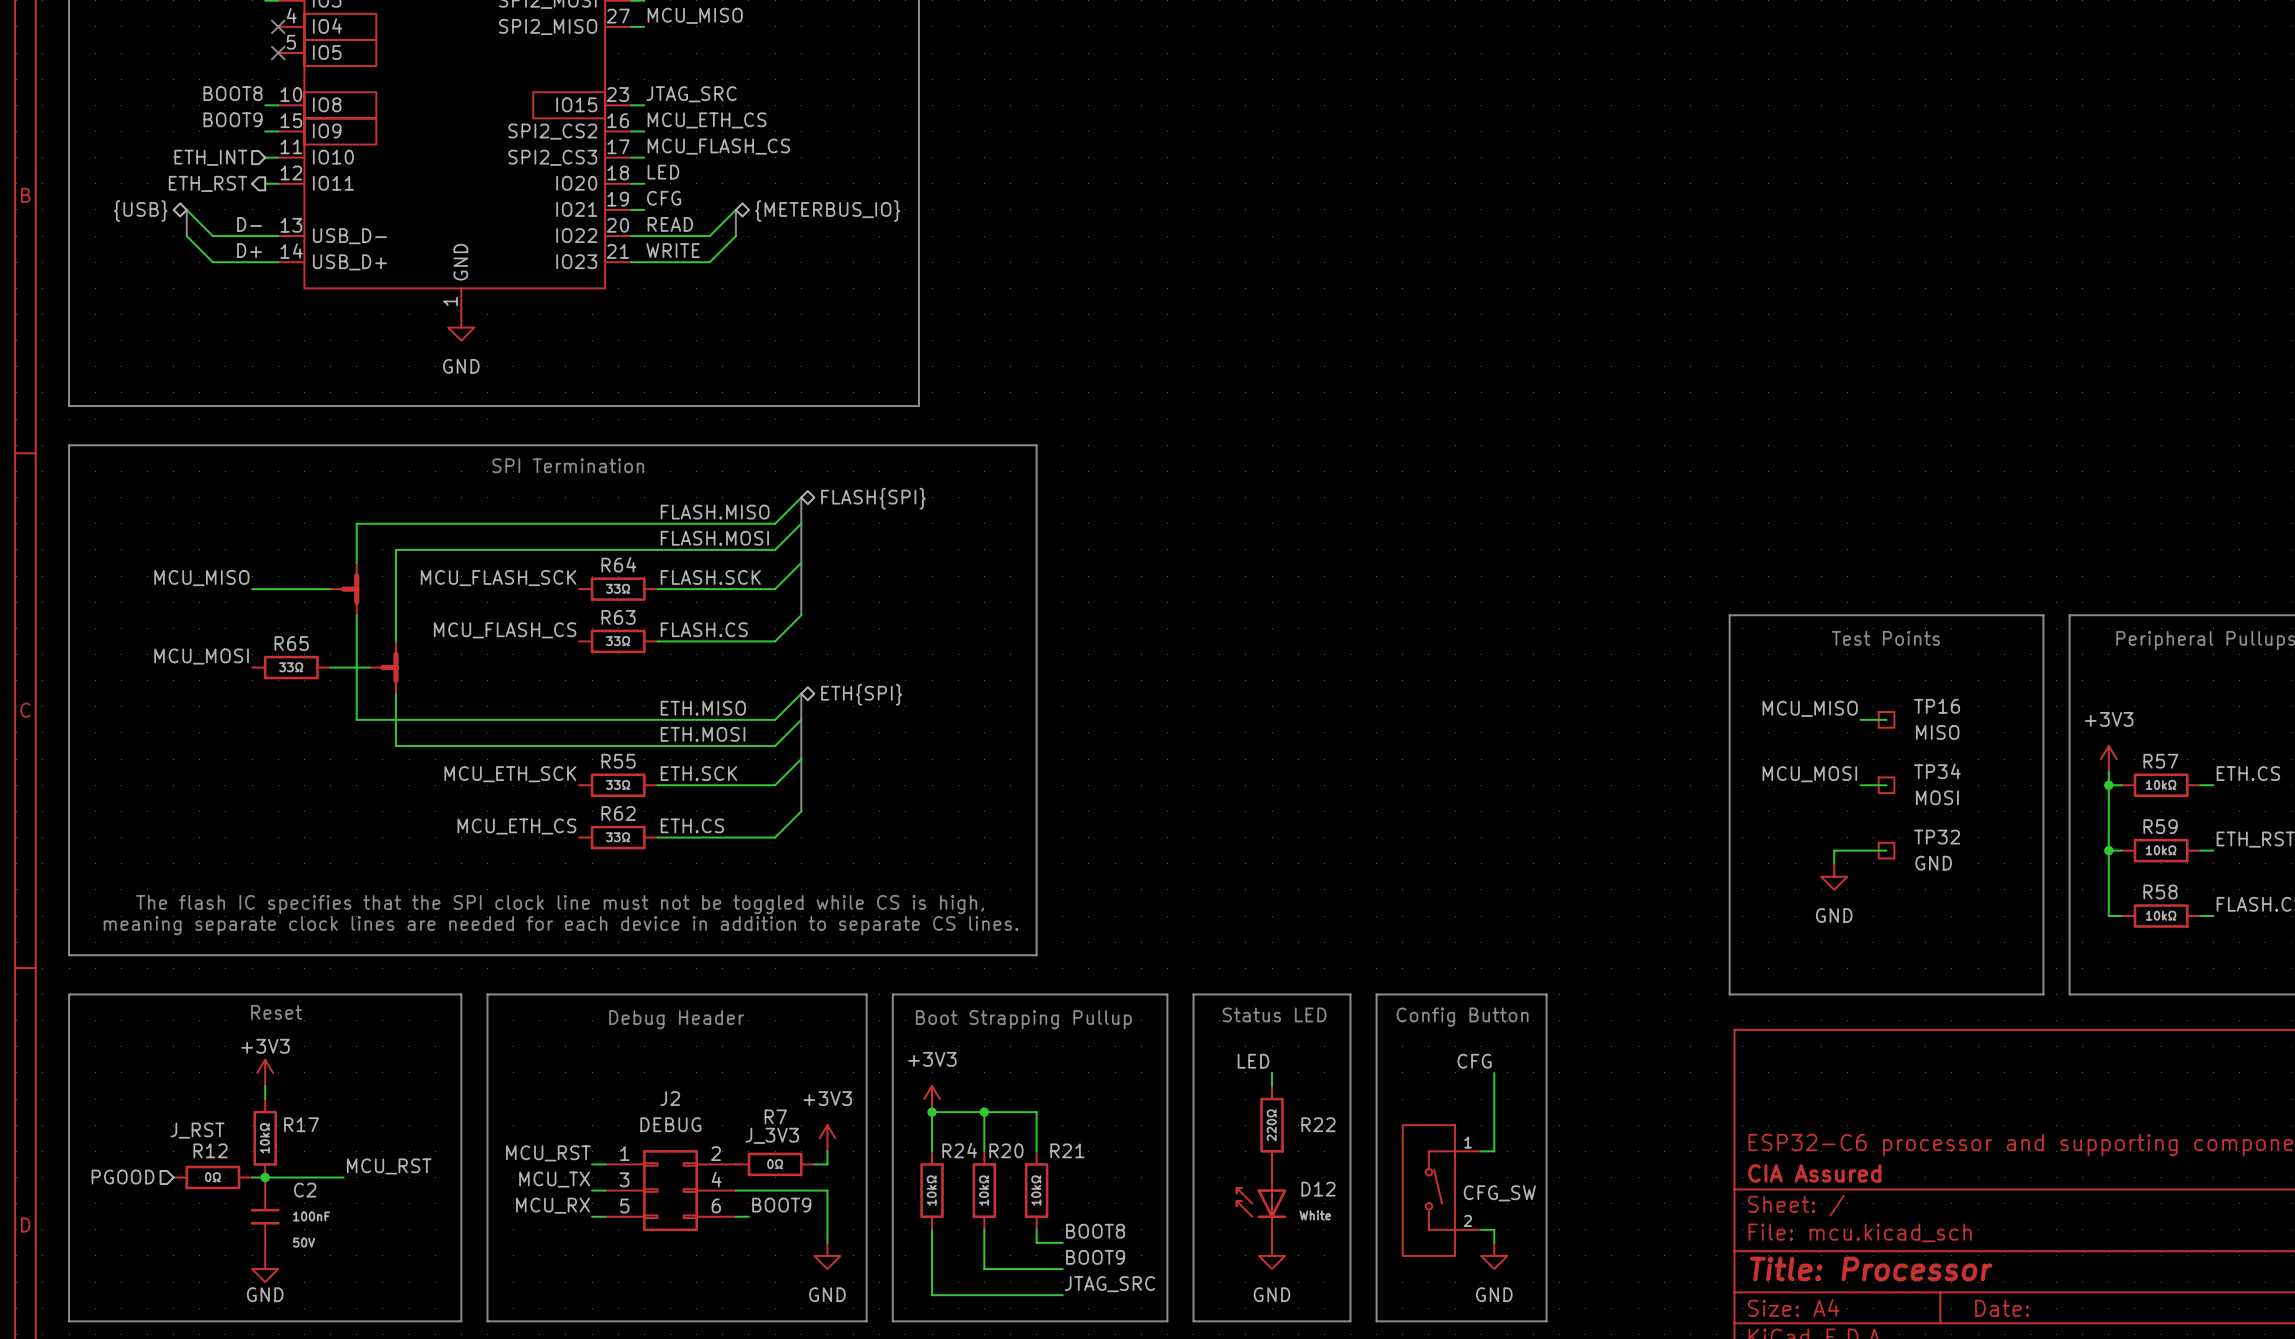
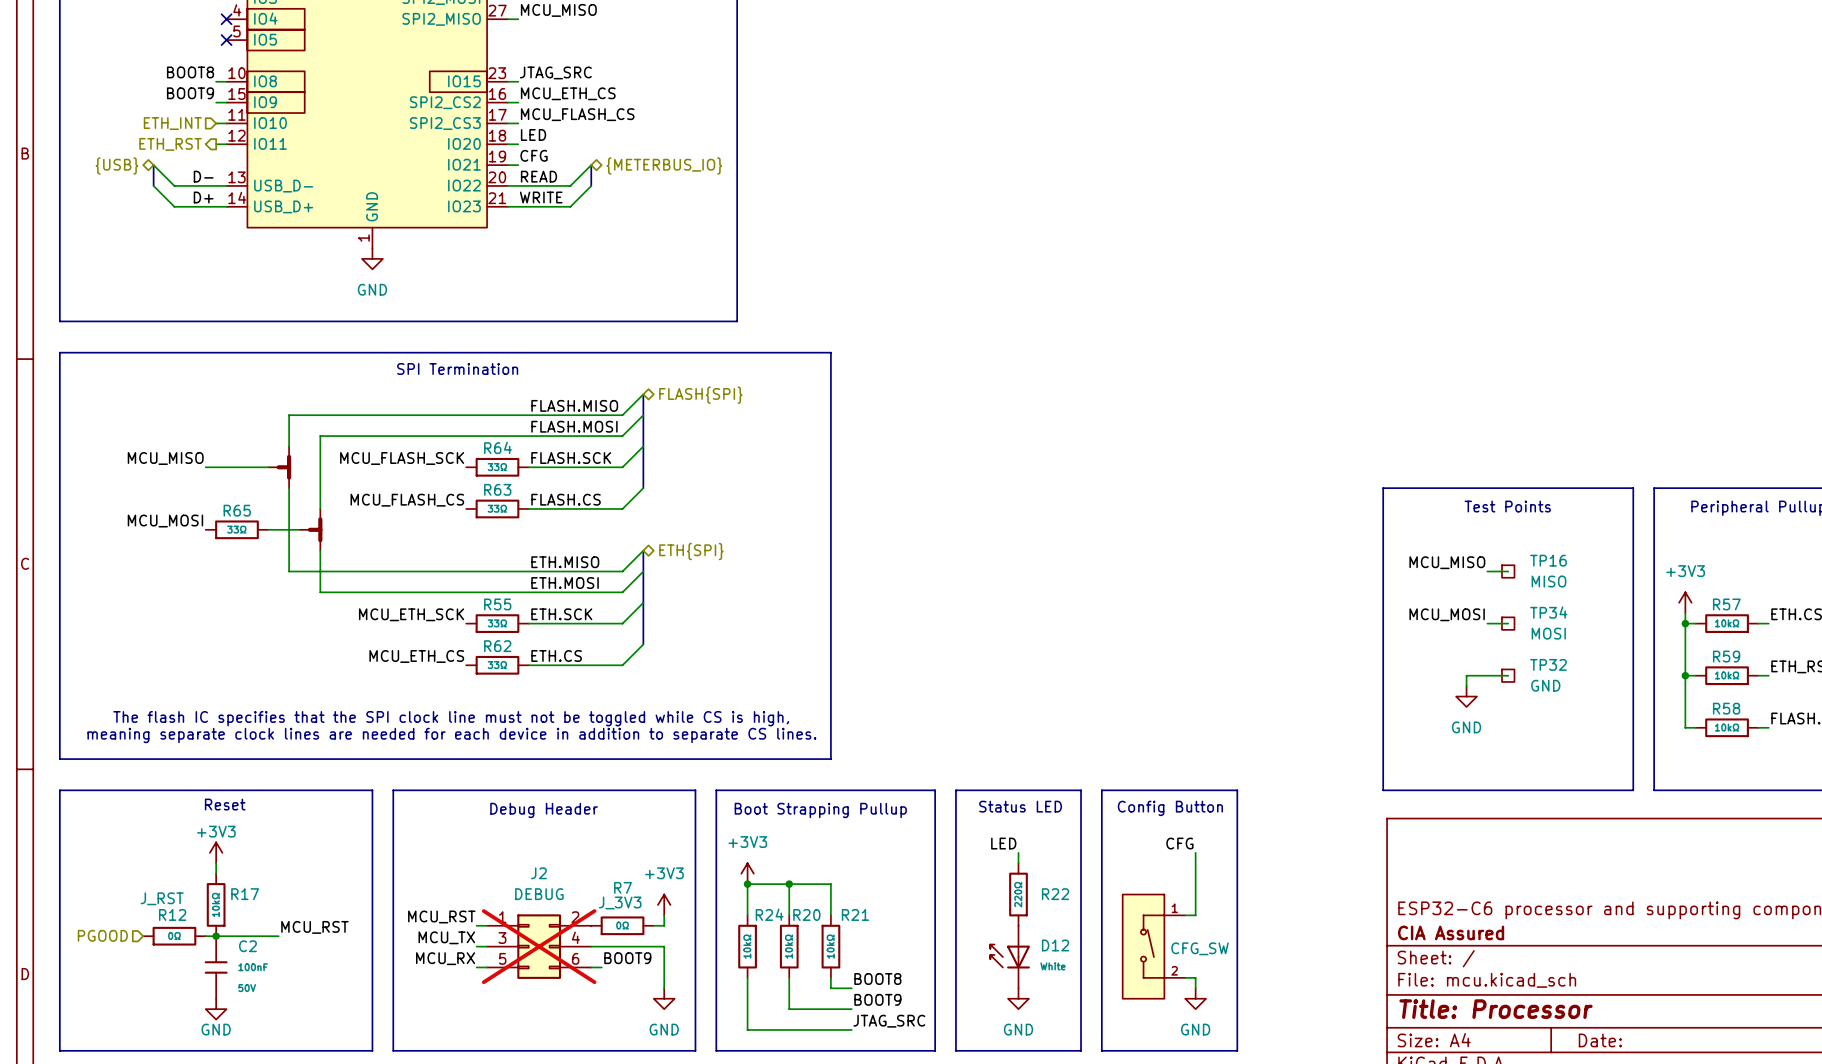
J2 do-not-place cross: none -> (539, 946)

